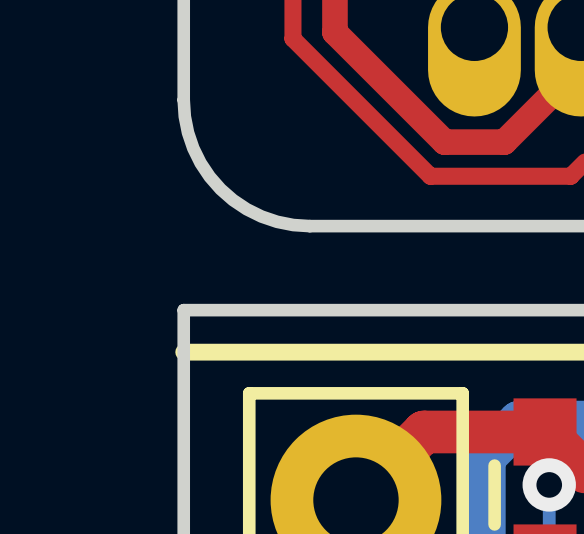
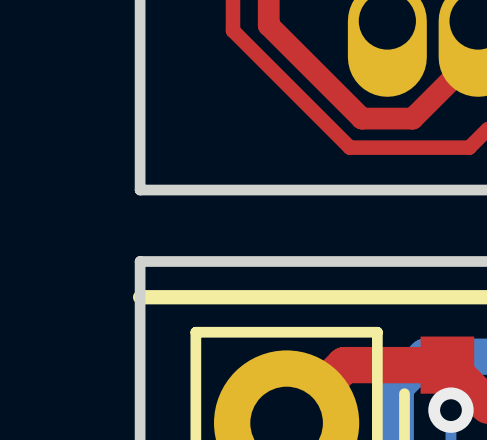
board edge: (183, 100) (188, 132) (193, 148) (200, 163) (220, 189) (246, 209) (261, 216) (293, 225) (309, 226) -> (140, 82) (140, 190) (247, 190)

